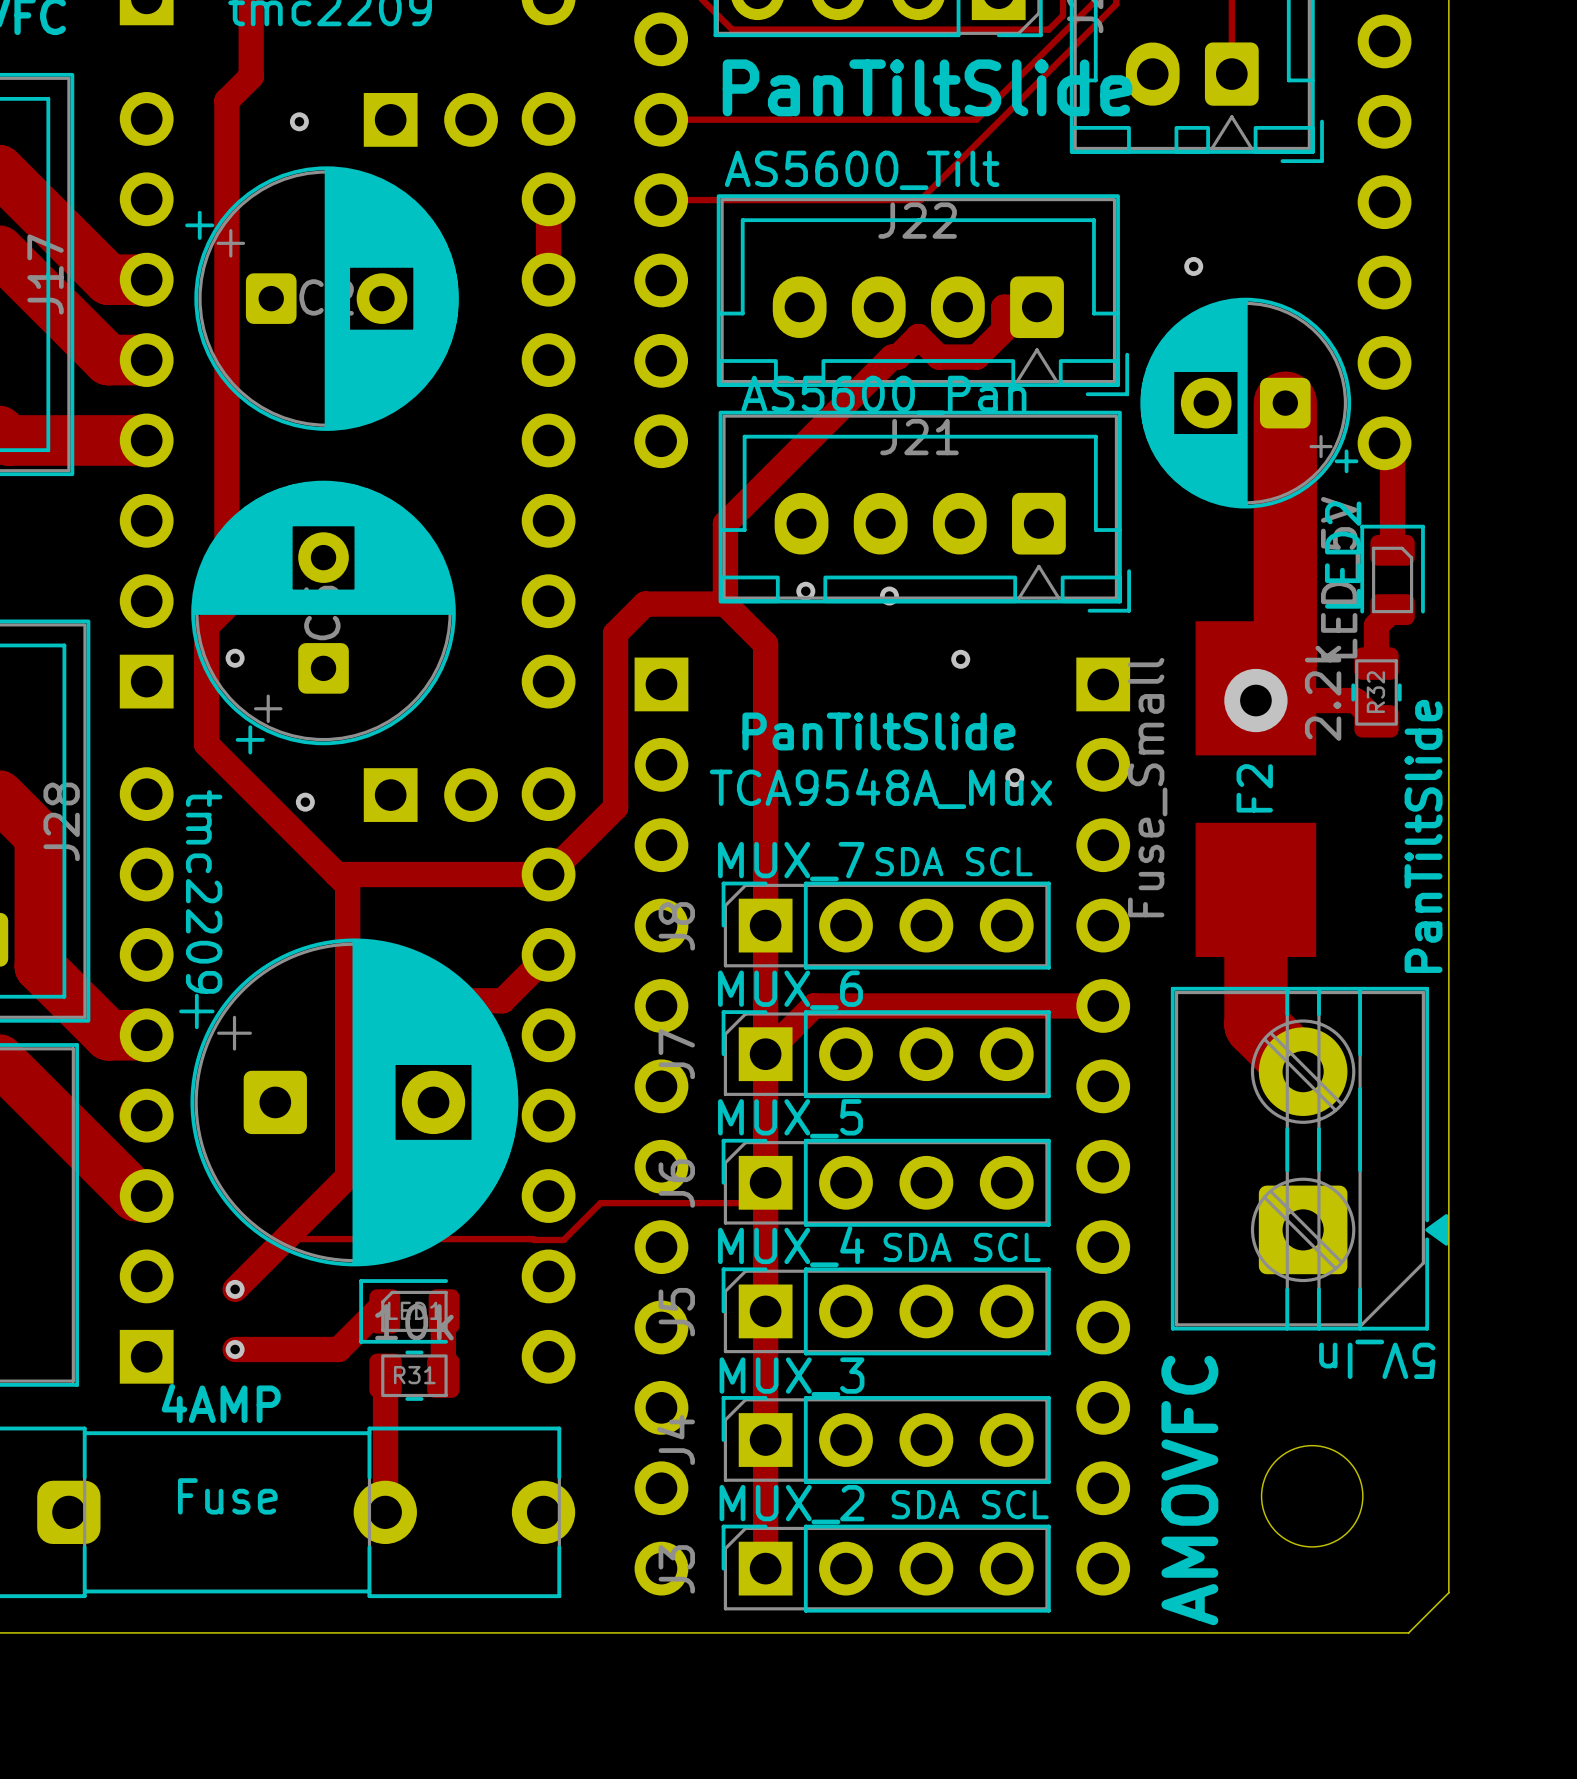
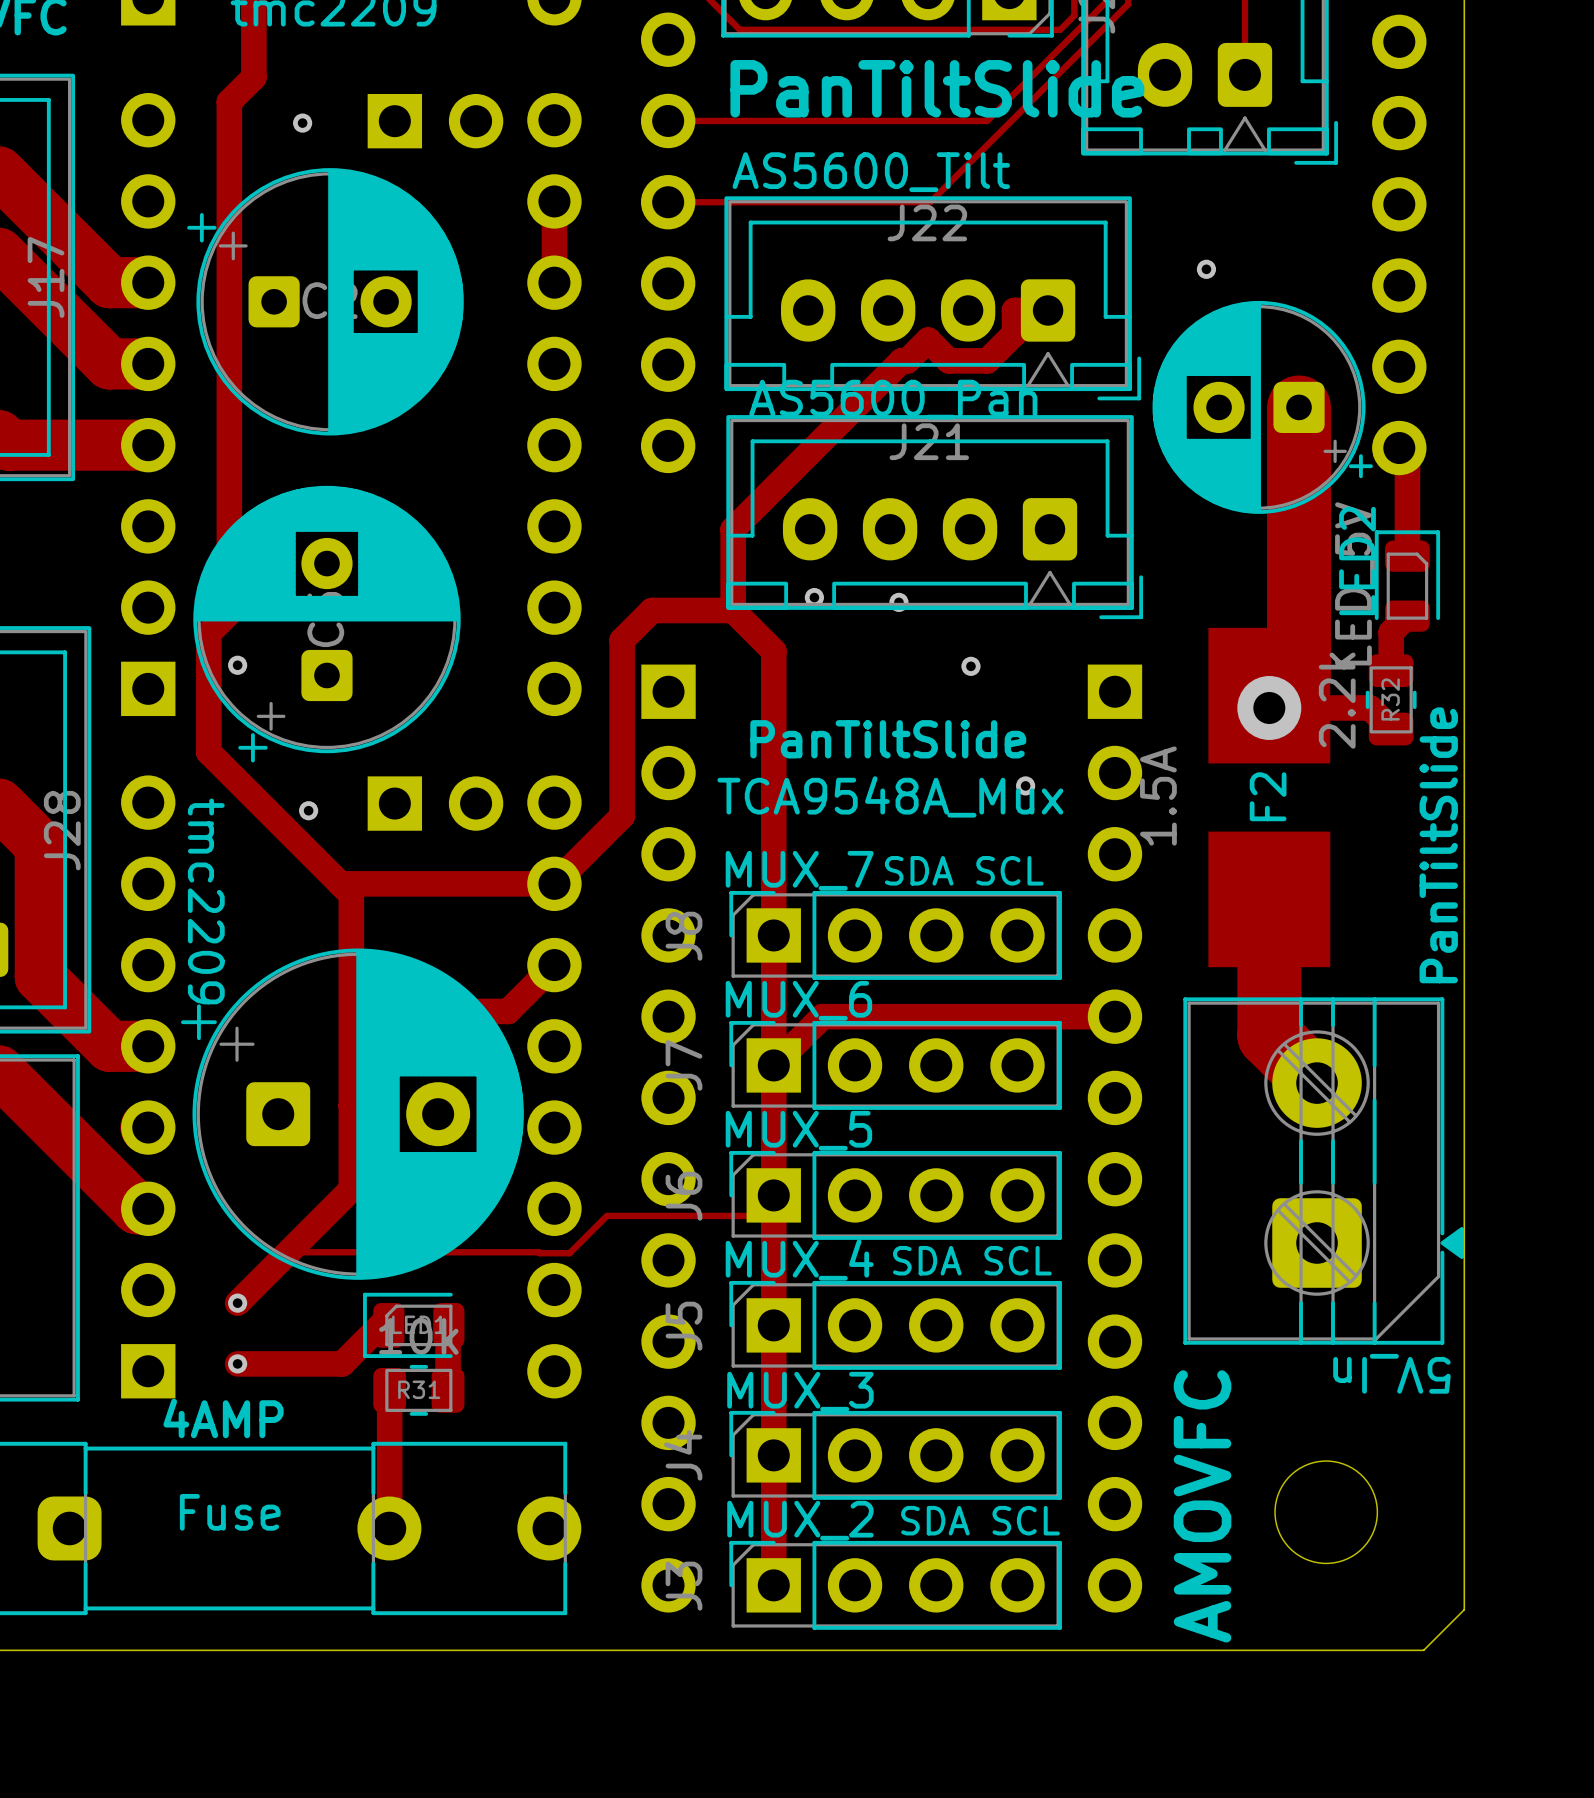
F2 value: Fuse_Small (1147, 787) -> 1.5A (1158, 796)

